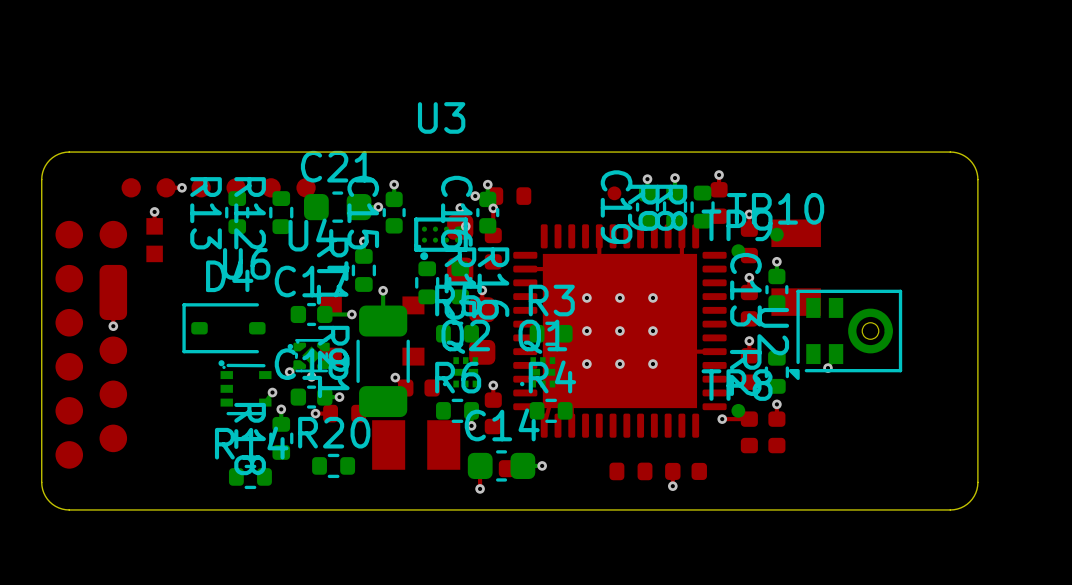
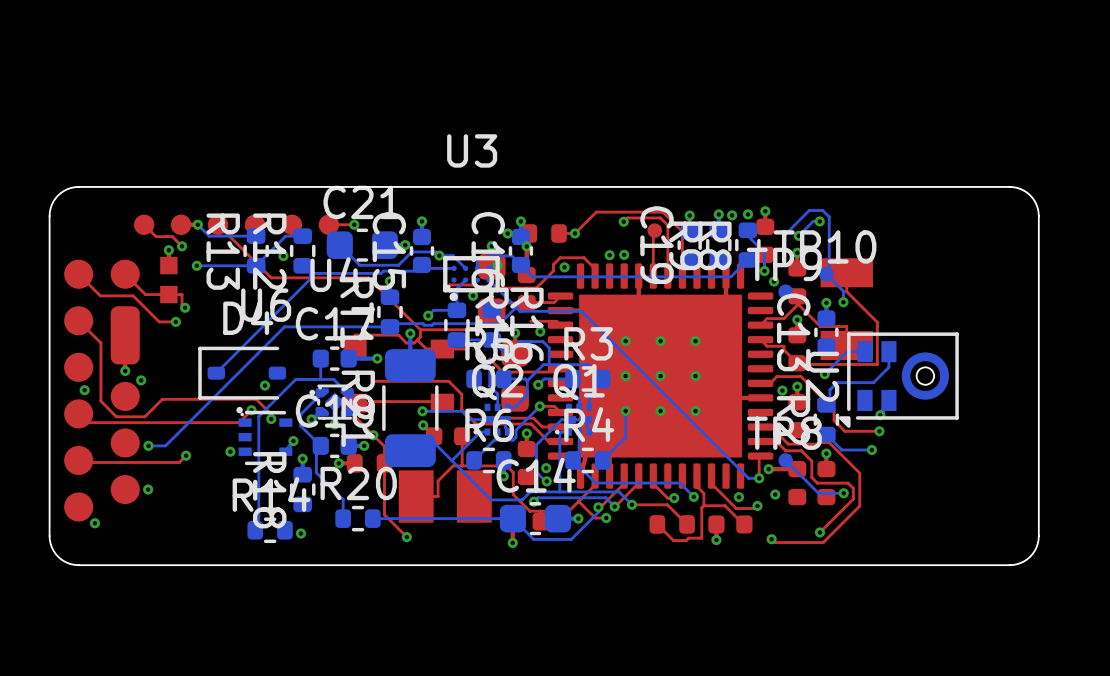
via: none -> (747, 214)
via: none -> (732, 215)
top track: none -> (623, 221) (627, 217) (660, 217) (667, 225) (667, 276)
via: none -> (623, 221)
bottom track: none -> (819, 221) (813, 221) (798, 235)
via: none -> (819, 221)
top track: none -> (144, 224) (156, 236) (172, 236) (182, 246)
bottom track: none -> (197, 224) (209, 236) (256, 236)
top track: none -> (218, 224) (271, 277) (368, 277) (420, 329)
top track: none -> (354, 224) (328, 224)
via: none -> (354, 224)
top track: none -> (654, 230) (653, 276)
bottom track: none -> (747, 230) (747, 235) (764, 252) (764, 271)
top track: none -> (559, 233) (574, 233) (596, 212) (662, 212) (682, 231) (682, 276)
via: none -> (575, 233)
bottom track: none -> (302, 236) (285, 236) (256, 265) (196, 265)
via: none -> (798, 235)
bottom track: none -> (784, 241) (784, 234) (809, 210) (822, 210) (829, 217) (829, 271) (826, 274) (843, 291) (843, 302)
bottom track: none -> (339, 245) (359, 265) (398, 265) (411, 251) (435, 251) (439, 255) (452, 255) (465, 268)
via: none -> (182, 246)
bottom track: none -> (487, 255) (490, 257) (492, 255) (511, 255) (532, 276) (730, 276) (747, 259)
via: none -> (609, 255)
via: none -> (624, 254)
via: none -> (283, 256)
via: none -> (439, 255)
bottom track: none -> (477, 257) (477, 268)
via: none -> (196, 265)
via: none -> (564, 267)
bottom track: none -> (454, 268) (425, 268) (422, 264) (419, 271) (310, 273) (310, 279) (216, 373)
via: none -> (764, 271)
top track: none -> (846, 272) (846, 291) (877, 322) (877, 364) (798, 364) (783, 349) (783, 346) (767, 346) (760, 339)
top track: none -> (78, 274) (100, 295) (133, 295) (159, 321) (175, 321)
top track: none -> (125, 274) (145, 294) (182, 294) (182, 304) (185, 307)
top track: none -> (595, 276) (595, 268) (584, 257) (560, 257) (553, 264) (553, 270) (536, 288) (478, 288) (475, 284) (449, 284) (446, 288)
bottom track: none -> (465, 280) (456, 288) (456, 310) (433, 310) (428, 315)
bottom track: none -> (488, 280) (520, 311) (581, 311) (748, 478) (759, 478)
via: none -> (774, 281)
via: none -> (473, 295)
top track: none -> (560, 296) (554, 302) (500, 303) (473, 329) (420, 329)
top track: none -> (797, 296) (797, 303) (820, 326) (846, 326) (846, 345)
via: none -> (843, 302)
top track: none -> (798, 304) (783, 318) (767, 318) (760, 325)
via: none -> (185, 307)
bottom track: none -> (516, 307) (499, 323) (433, 323) (432, 325) (393, 323) (390, 326) (284, 326) (165, 445) (148, 445)
via: none -> (428, 315)
top track: none -> (78, 320) (100, 343) (100, 401) (116, 416) (144, 416) (162, 399) (256, 399) (271, 414) (271, 419)
via: none -> (175, 321)
top track: none -> (530, 321) (556, 321) (560, 325)
top track: none -> (420, 329) (420, 336) (417, 340)
via: none -> (540, 331)
top track: none -> (417, 340) (426, 349) (467, 349)
top track: none -> (417, 340) (414, 343) (406, 343) (398, 335) (355, 335) (355, 349)
bottom track: none -> (456, 339) (491, 339) (504, 352) (508, 352) (519, 341) (542, 341) (549, 347) (549, 364)
bottom track: none -> (865, 351) (847, 351) (824, 374)
bottom track: none -> (888, 351) (888, 367) (873, 382) (837, 382) (829, 389) (829, 401) (826, 404)
bottom track: none -> (320, 358) (320, 379)
top track: none -> (489, 359) (502, 372) (557, 372) (560, 368)
bottom track: none -> (489, 359) (489, 386) (497, 393) (497, 407)
via: none -> (824, 374)
bottom track: none -> (503, 378) (525, 378) (527, 380)
via: none -> (141, 380)
top track: none -> (374, 381) (448, 381) (461, 394) (461, 409) (476, 424) (531, 424) (548, 441) (560, 441)
bottom track: none -> (527, 380) (527, 395) (515, 407) (507, 407)
bottom track: none -> (527, 380) (543, 364) (588, 364) (602, 378) (589, 392) (589, 407)
top track: none -> (760, 383) (770, 383) (776, 376) (800, 376) (834, 409) (834, 420) (844, 431) (879, 431)
via: none -> (264, 385)
bottom track: none -> (538, 384) (544, 378) (573, 378) (573, 393) (579, 399) (579, 407)
via: none -> (538, 384)
via: none -> (84, 390)
via: none -> (782, 390)
bottom track: none -> (322, 392) (300, 414) (300, 425) (320, 445) (320, 449) (316, 454) (316, 472) (343, 499) (343, 518)
top track: none -> (442, 403) (440, 401) (355, 403) (355, 416) (384, 446) (384, 514) (406, 537)
top track: none -> (539, 406) (554, 406) (560, 412)
bottom track: none -> (539, 406) (516, 430) (516, 437) (513, 440) (494, 440) (474, 460)
via: none -> (539, 406)
top track: none -> (476, 409) (484, 418) (533, 418) (542, 426) (560, 426)
top track: none -> (251, 410) (239, 422) (87, 422) (78, 413)
via: none -> (251, 410)
bottom track: none -> (347, 411) (349, 409) (349, 395) (333, 379) (295, 379) (258, 416) (258, 526) (255, 530)
bottom track: none -> (422, 411) (461, 411) (470, 419) (505, 419) (507, 432)
via: none -> (422, 411)
bottom track: none -> (625, 410) (625, 437) (602, 460)
via: none -> (271, 419)
top track: none -> (760, 426) (771, 426) (788, 444) (829, 442) (859, 473) (859, 506) (823, 542) (774, 542) (771, 539)
via: none -> (879, 431)
bottom track: none -> (487, 432) (480, 432) (451, 460)
bottom track: none -> (568, 432) (559, 433) (559, 491)
bottom track: none -> (579, 432) (579, 454) (573, 460) (595, 483) (680, 483) (693, 496)
bottom track: none -> (589, 432) (587, 419) (561, 419) (536, 444) (536, 472) (546, 481)
bottom track: none -> (826, 434) (841, 450) (871, 450)
via: none -> (373, 435)
top track: none -> (462, 436) (462, 465)
top track: none -> (760, 441) (776, 441) (785, 450) (801, 450) (811, 461) (811, 477) (817, 483) (848, 483) (853, 488) (853, 498) (819, 532)
via: none -> (148, 445)
via: none -> (871, 450)
bottom track: none -> (410, 450) (428, 450) (435, 444) (491, 499) (522, 499) (530, 491) (619, 491) (631, 504)
via: none -> (230, 451)
top track: none -> (186, 455) (179, 462) (80, 462) (78, 460)
via: none -> (186, 455)
top track: none -> (760, 456) (759, 478)
bottom track: none -> (785, 460) (818, 493) (843, 493)
via: none -> (546, 468)
top track: none -> (595, 476) (595, 485) (568, 511) (529, 511) (513, 494) (513, 472) (506, 465) (453, 465) (438, 480) (438, 496) (416, 496)
top track: none -> (624, 476) (624, 483) (598, 507)
top track: none -> (638, 476) (638, 483) (615, 506)
top track: none -> (653, 476) (653, 483) (667, 498) (674, 498)
top track: none -> (696, 476) (696, 486) (703, 493) (703, 505)
top track: none -> (711, 476) (711, 483) (736, 508) (754, 508) (757, 505)
via: none -> (759, 478)
via: none -> (546, 481)
via: none -> (148, 489)
via: none -> (843, 493)
via: none -> (775, 494)
via: none -> (693, 496)
via: none -> (738, 497)
via: none -> (674, 498)
bottom track: none -> (533, 501) (537, 497) (605, 497) (614, 506)
via: none -> (533, 501)
top track: none -> (578, 501) (595, 518) (606, 518)
top track: none -> (631, 504) (667, 504) (687, 524)
via: none -> (631, 504)
top track: none -> (703, 505) (701, 507) (701, 538) (673, 540) (657, 524)
top track: none -> (703, 505) (724, 505) (744, 524)
via: none -> (757, 505)
via: none -> (614, 506)
bottom track: none -> (598, 507) (598, 512) (571, 539) (533, 539) (512, 518) (372, 518)
via: none -> (598, 507)
via: none -> (606, 518)
via: none -> (94, 523)
via: none -> (301, 533)
via: none -> (819, 532)
via: none -> (406, 537)
via: none -> (771, 539)

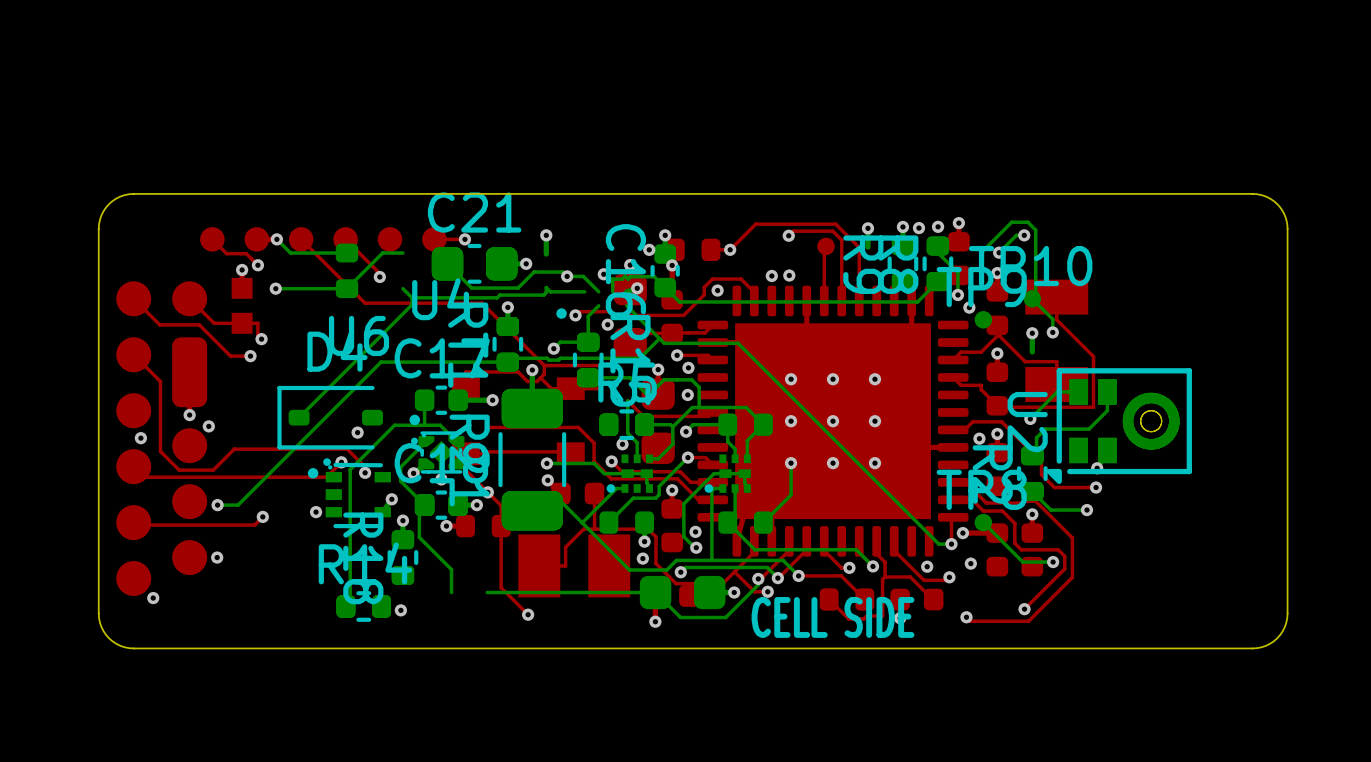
top track: none -> (345, 239) (379, 273) (379, 276)
part: none -> (474, 263)
C19: (689, 245) -> none
part: none -> (937, 263)
R13: (256, 250) -> none
part: none -> (347, 270)
R12: (302, 250) -> none
C15: (422, 250) -> none
bottom track: none -> (603, 274) (608, 279) (622, 279) (625, 276)
via: none -> (603, 274)
bottom track: none -> (402, 288) (412, 297)
U3: (471, 278) -> none
drawing: none -> [556, 308, 567, 319]
via: none -> (575, 315)
part: none -> (507, 344)
via: none -> (677, 355)
part: none -> (588, 360)
R16: (491, 325) -> none
C13: (826, 332) -> none
via: none -> (687, 394)
drawing: none -> [409, 414, 420, 426]
part: none -> (626, 424)
R3: (587, 378) -> none
part: none -> (745, 424)
part: none -> (1119, 426)
via: none -> (622, 444)
part: none -> (532, 459)
via: none -> (611, 461)
drawing: none -> [307, 468, 319, 479]
part: none -> (629, 473)
Q2: (492, 419) -> none
part: none -> (727, 473)
Q1: (573, 419) -> none
part: none -> (1032, 473)
part: none -> (358, 494)
part: none -> (441, 505)
R6: (488, 460) -> none
part: none -> (626, 522)
R4: (587, 460) -> none
part: none -> (745, 522)
part: none -> (402, 557)
via: none -> (642, 558)
R20: (357, 518) -> none
C14: (535, 518) -> none
part: none -> (363, 606)
text: none -> CELL SIDE (833, 617)

